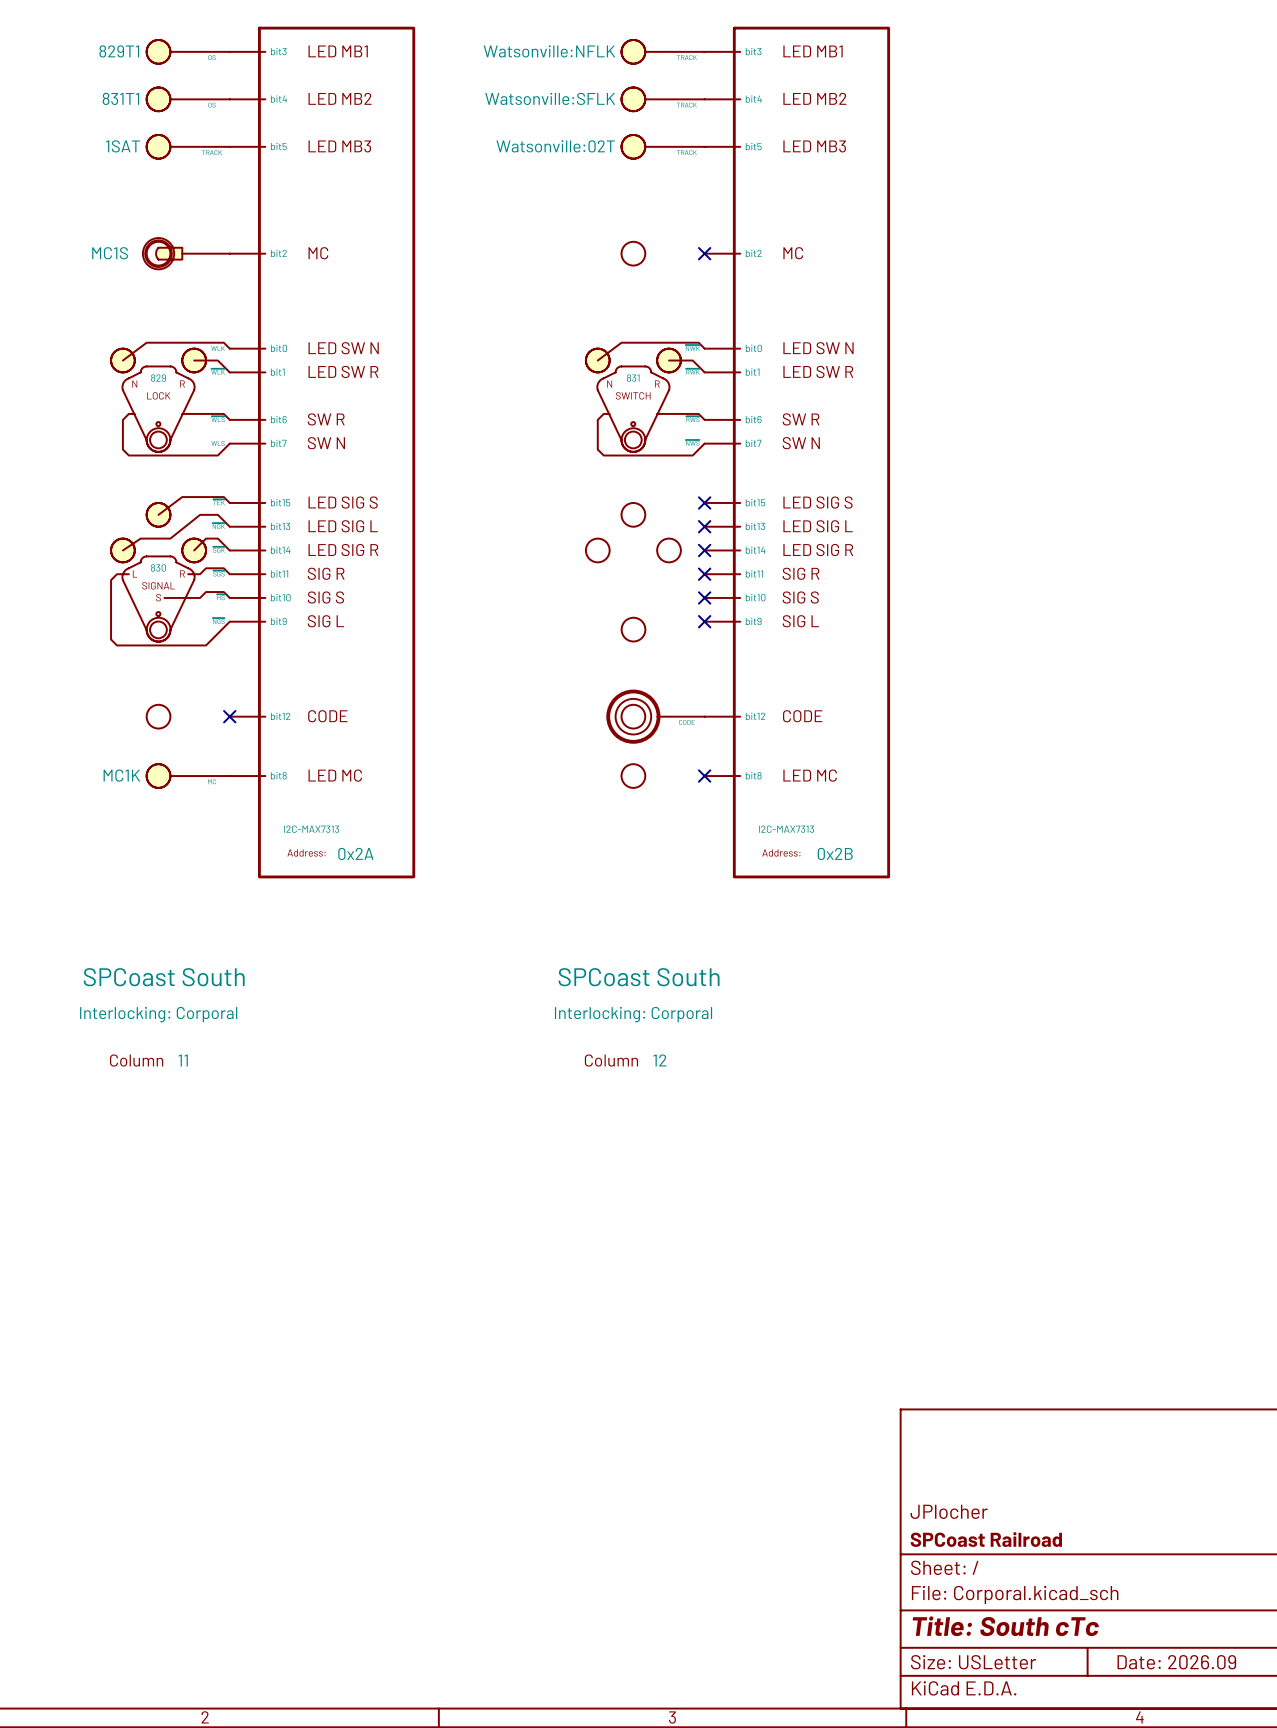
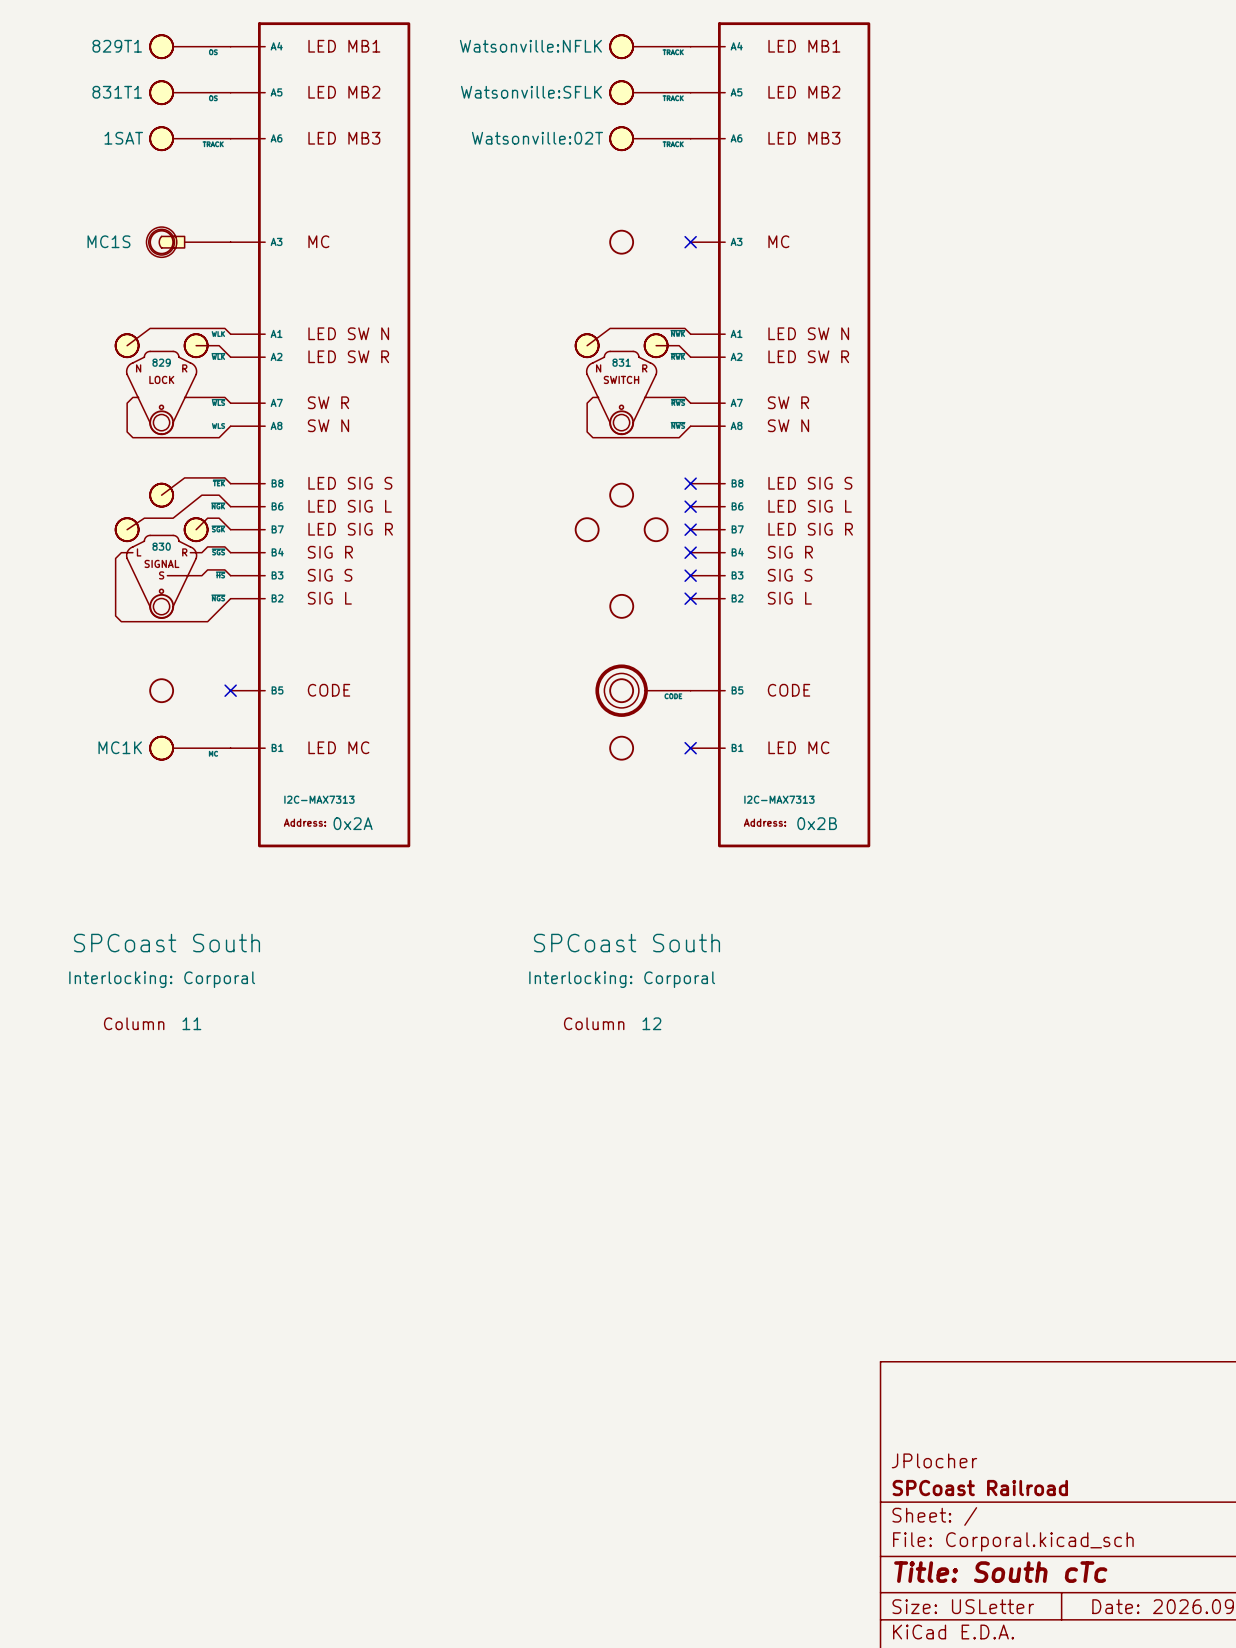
part symbol: [229, 26, 416, 879] -> [230, 22, 411, 848]
part symbol: [704, 26, 891, 879] -> [690, 22, 871, 848]

